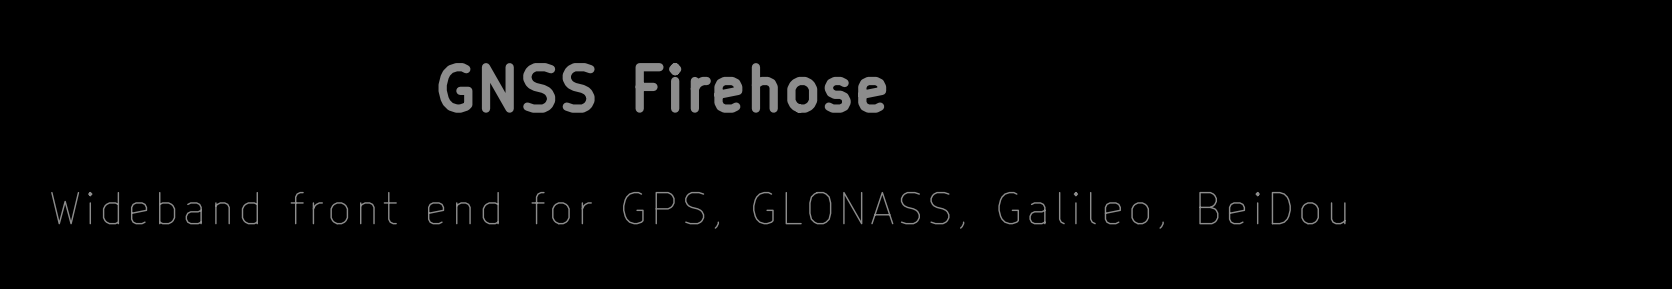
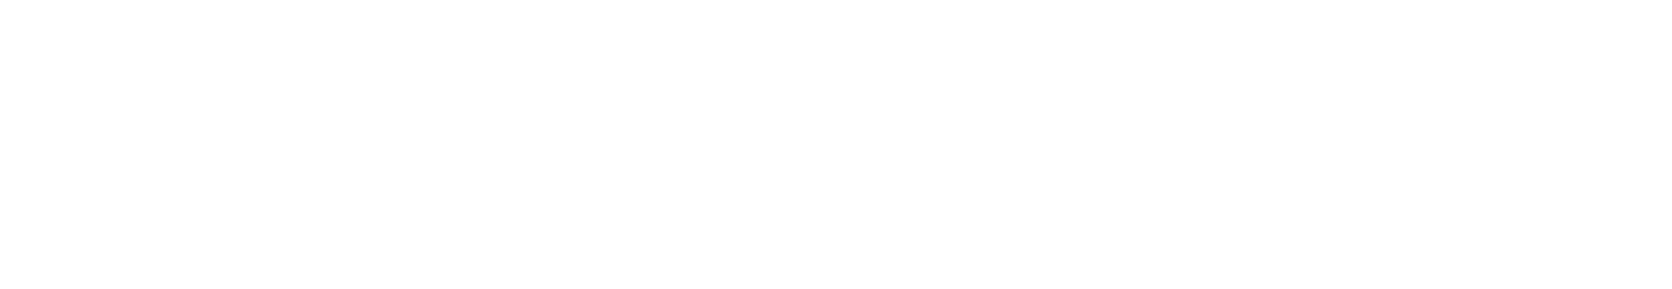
text: GNSS Firehose (662, 87) -> none
text: Wideband front end for GPS, GLONASS, Galileo, BeiDou (698, 210) -> none

